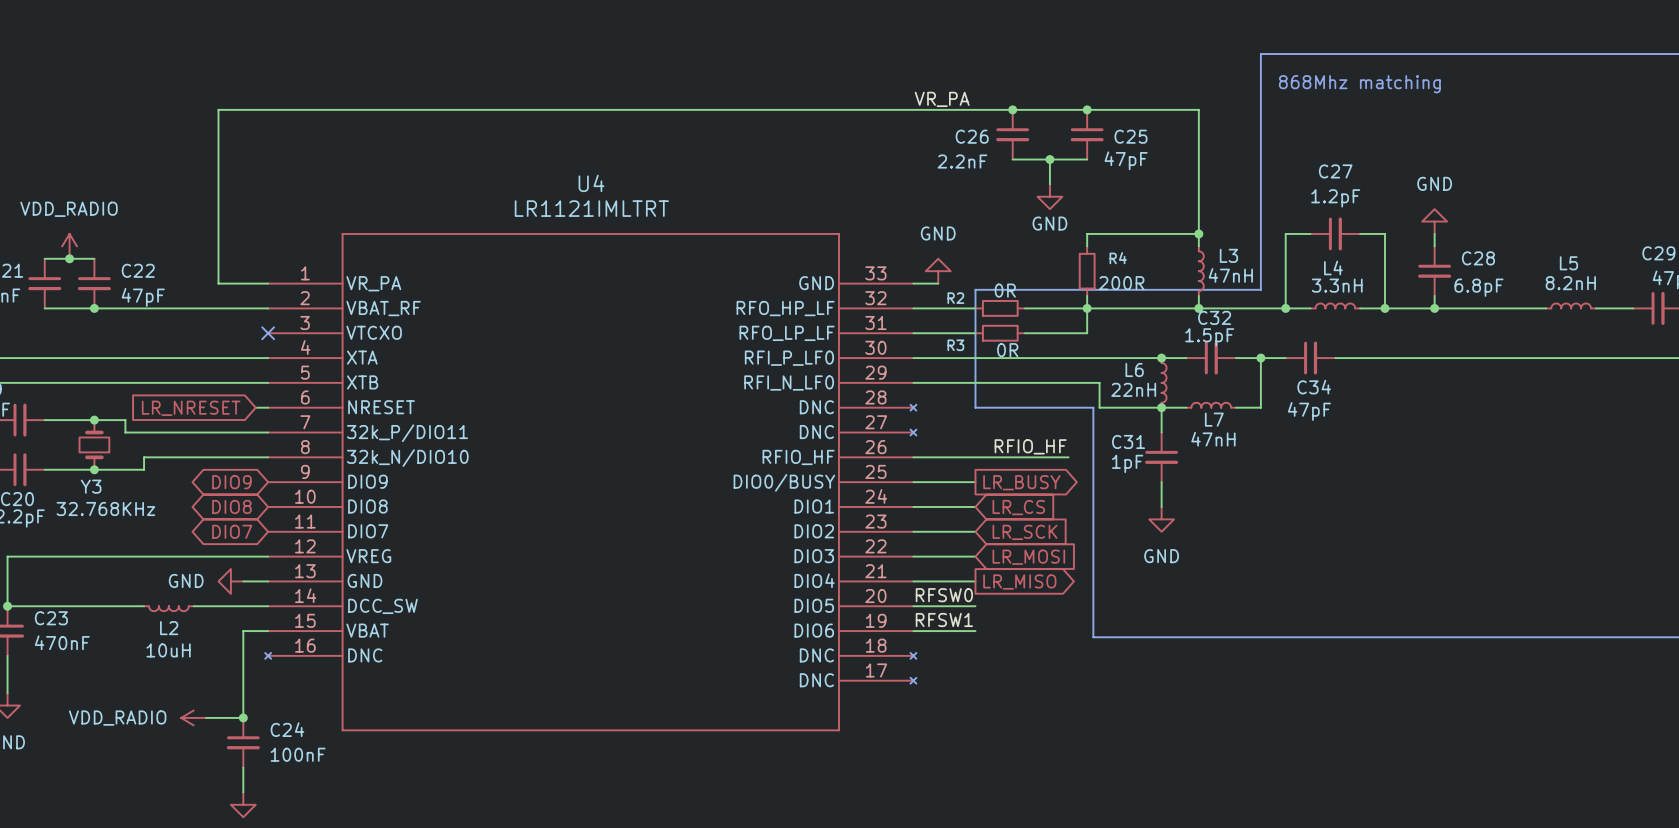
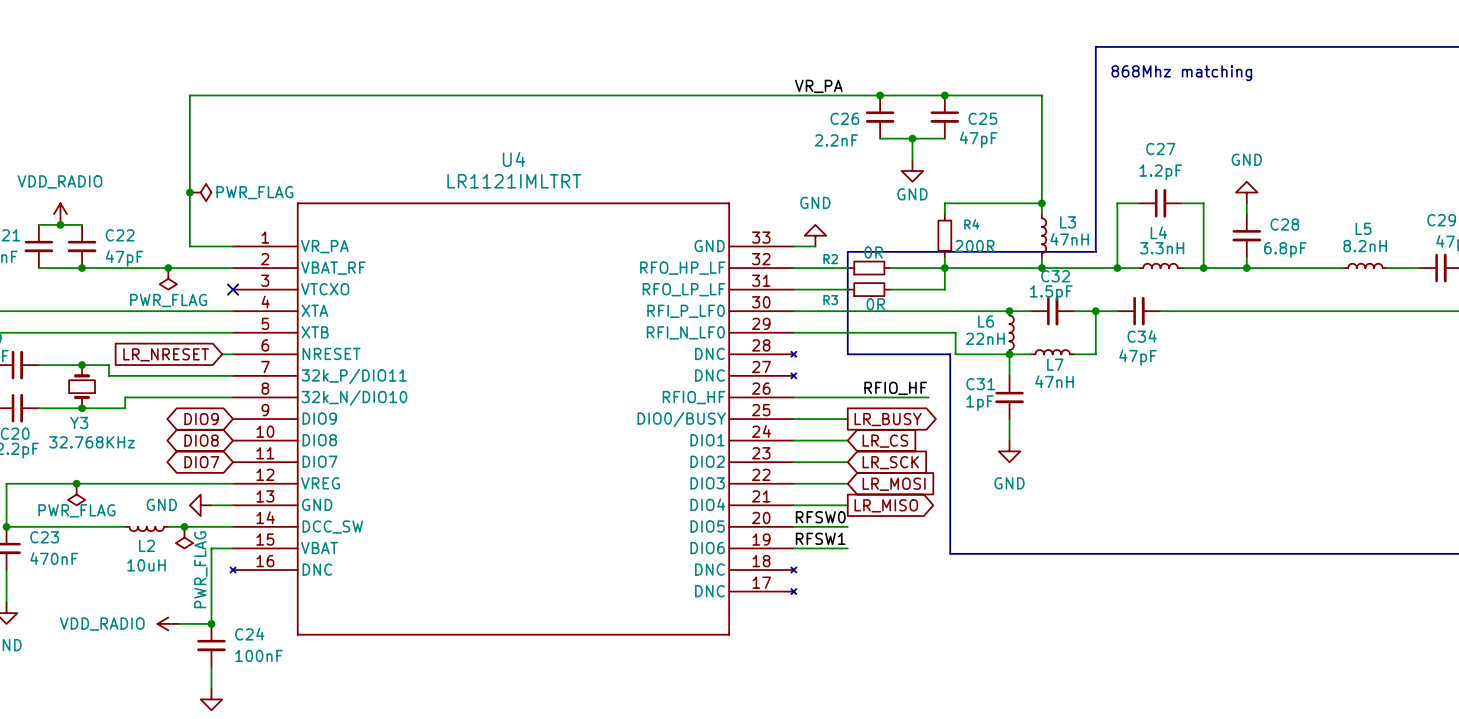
junction: none -> (189, 192)
power symbol: none -> PWR_FLAG (200, 192)
junction: none -> (168, 268)
power symbol: none -> PWR_FLAG (168, 278)
junction: none -> (76, 483)
power symbol: none -> PWR_FLAG (76, 494)
junction: none -> (184, 526)
power symbol: none -> PWR_FLAG (184, 537)

